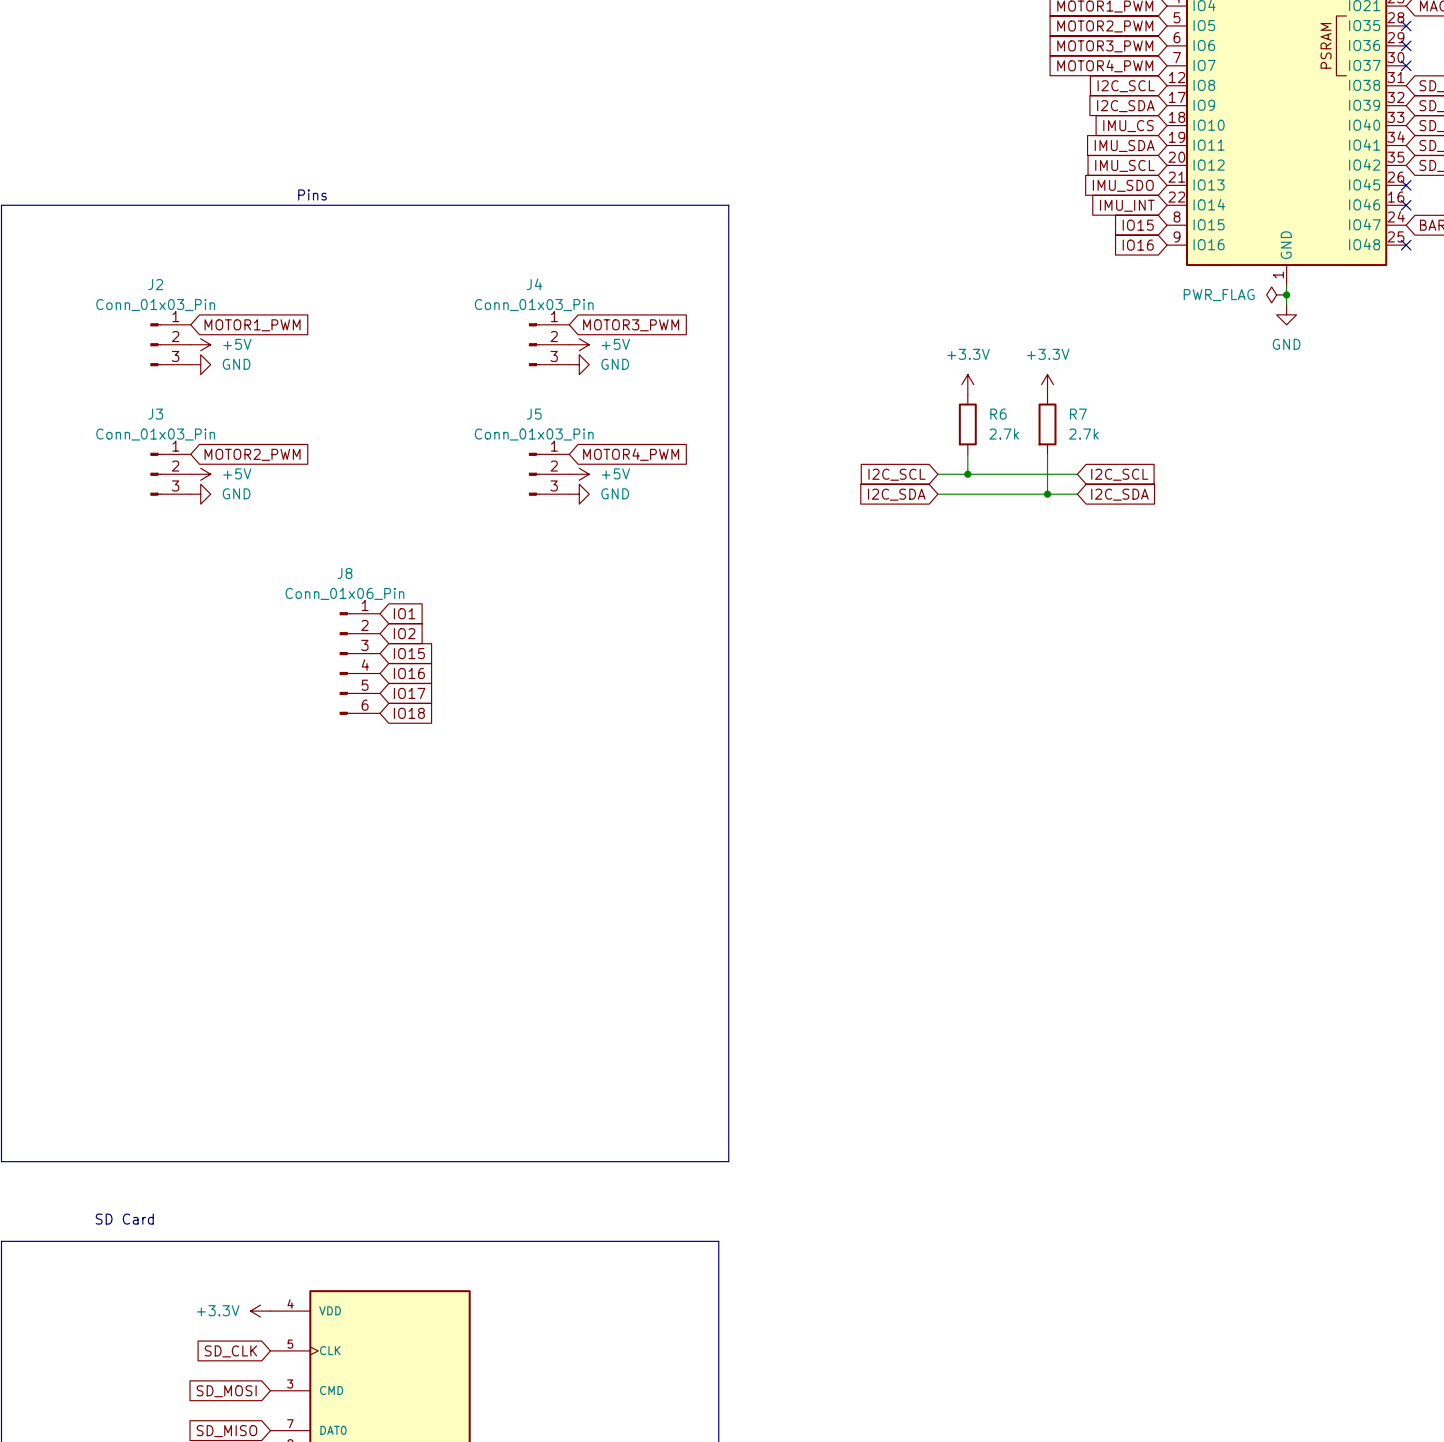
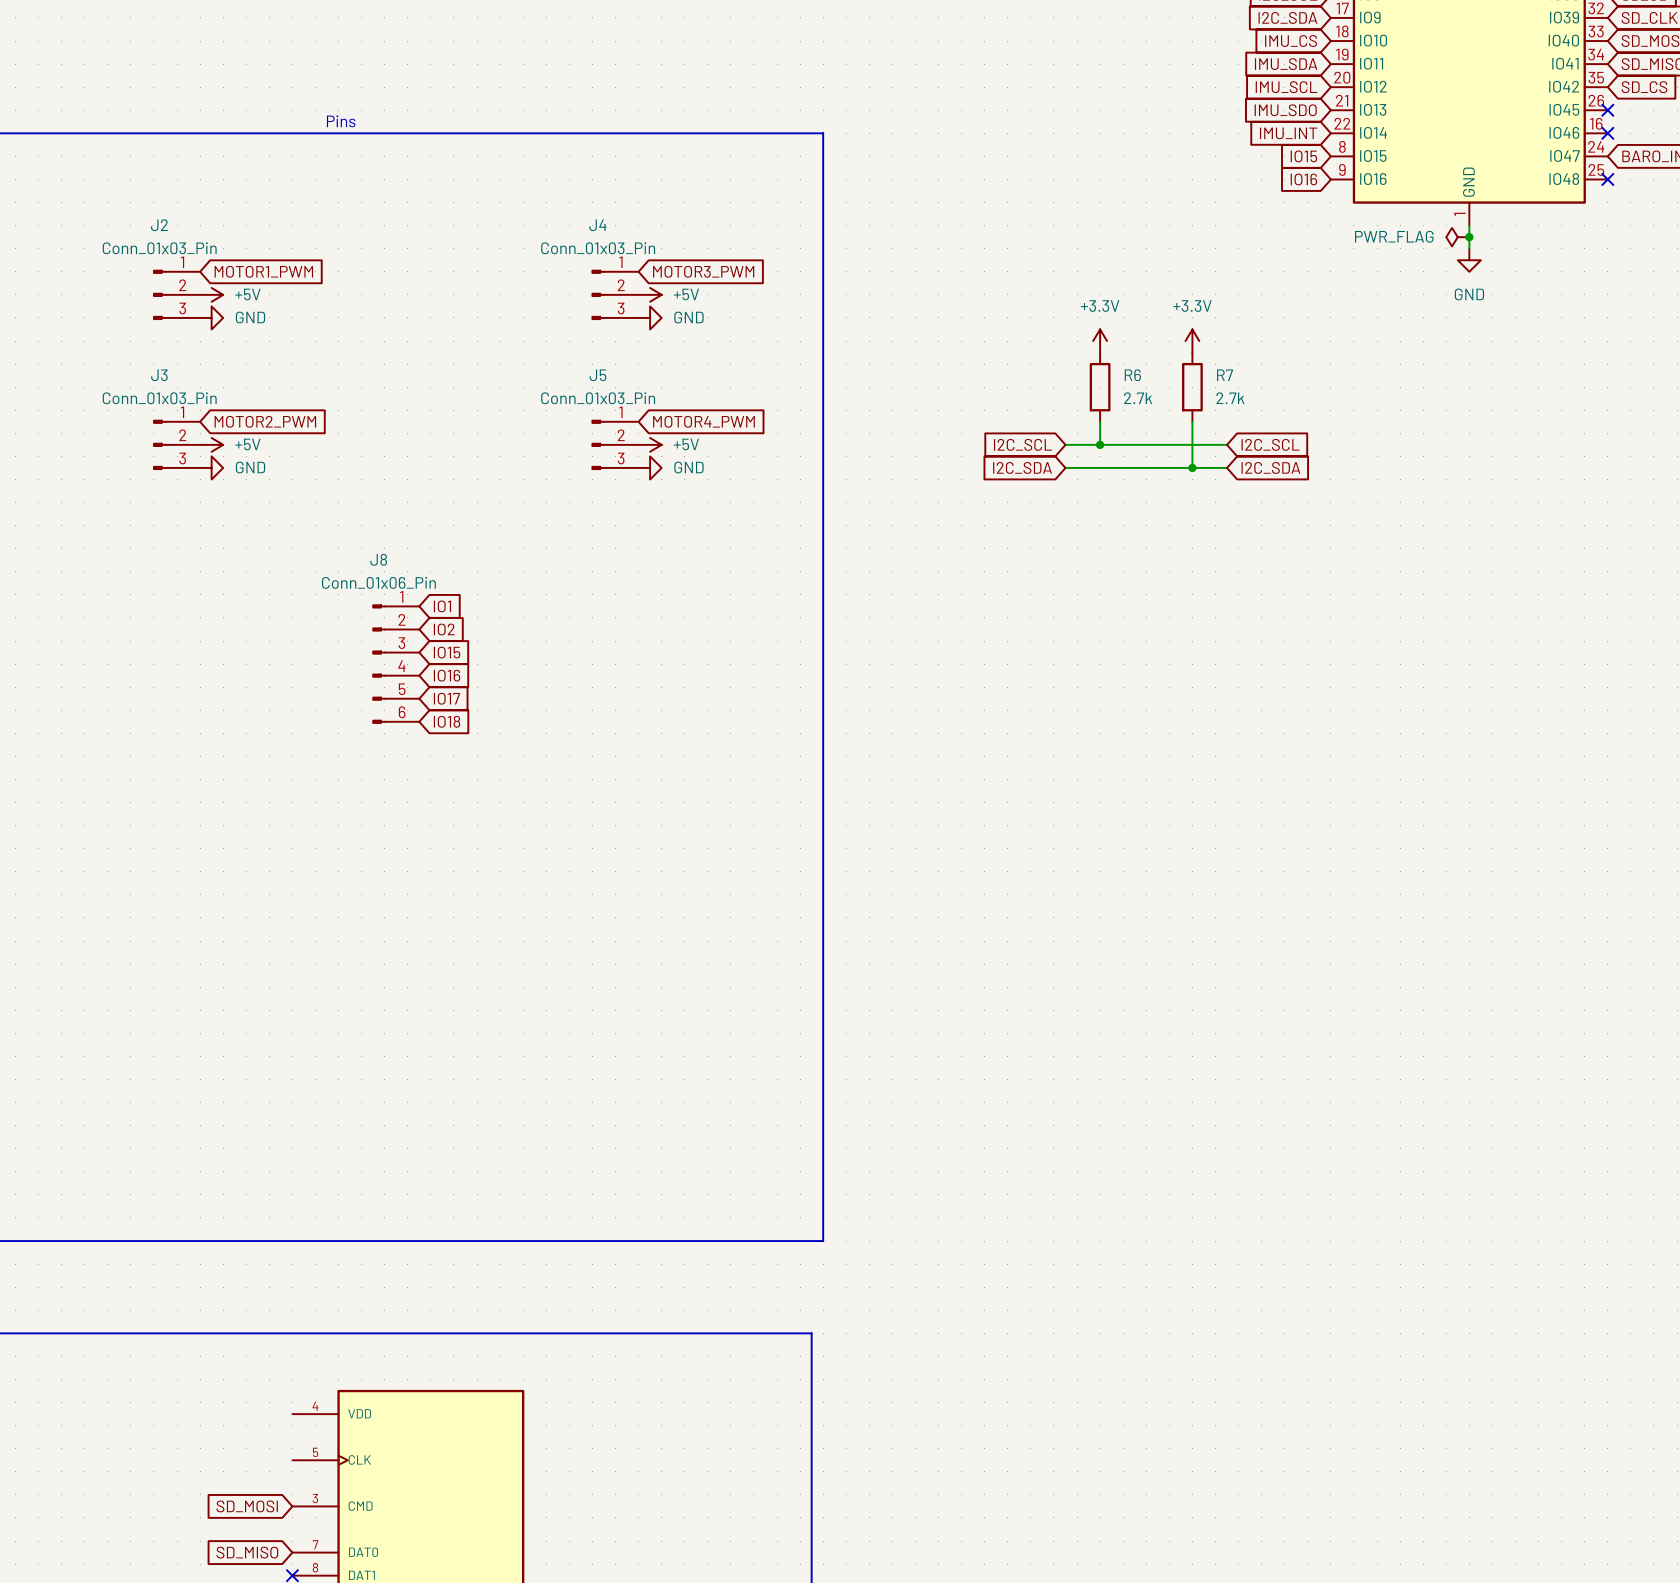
text: SD Card (124, 1219) -> none
power symbol: +3.3V (260, 1311) -> none
global label: SD_CLK (230, 1351) -> none

